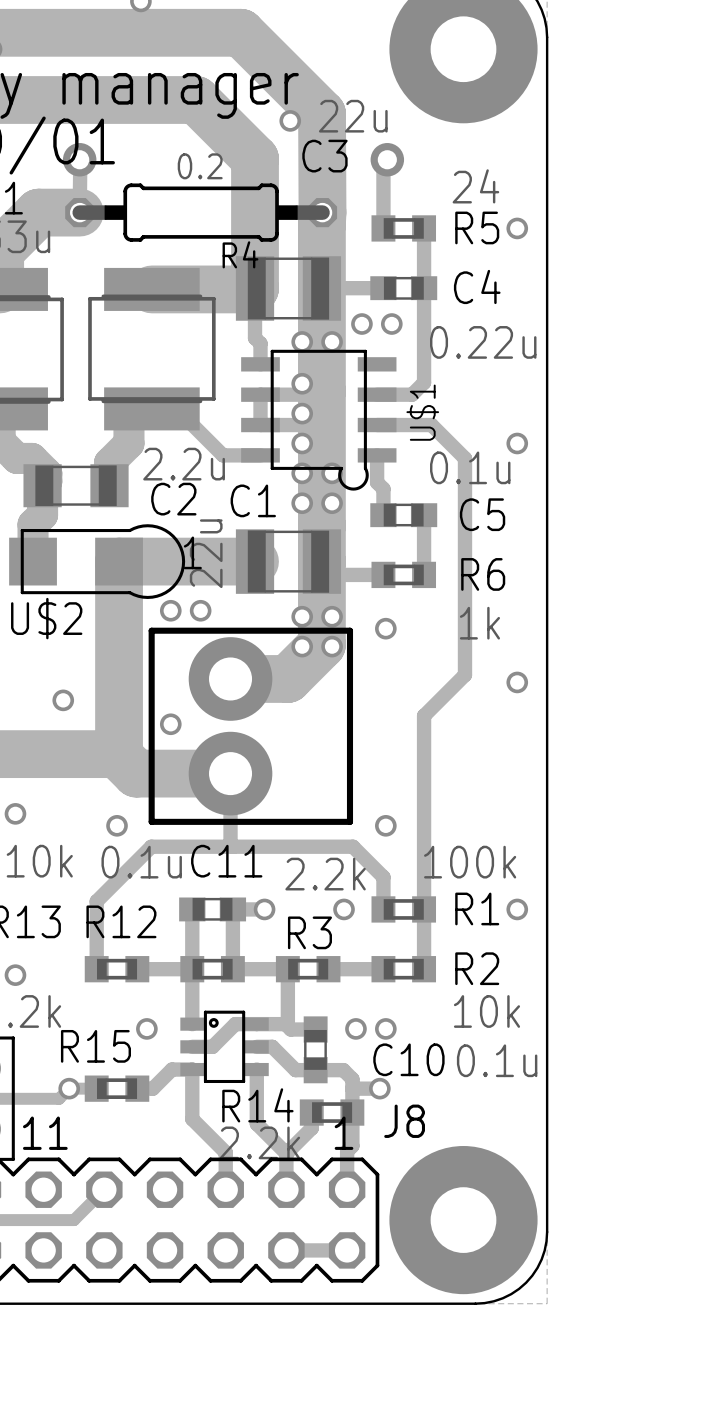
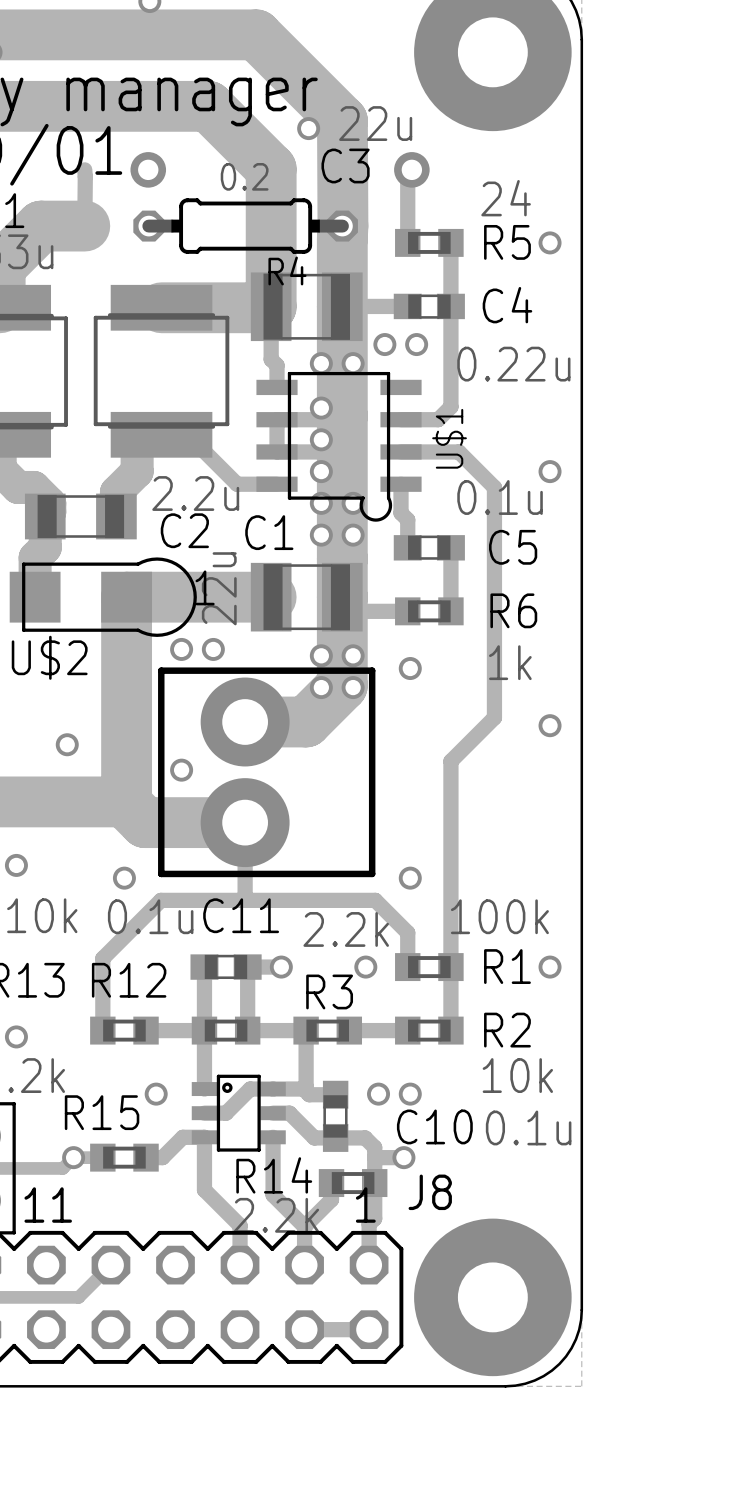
via position: (79, 159) -> (148, 169)
R4 footprint: [65, 183, 338, 242] -> [133, 198, 358, 254]

